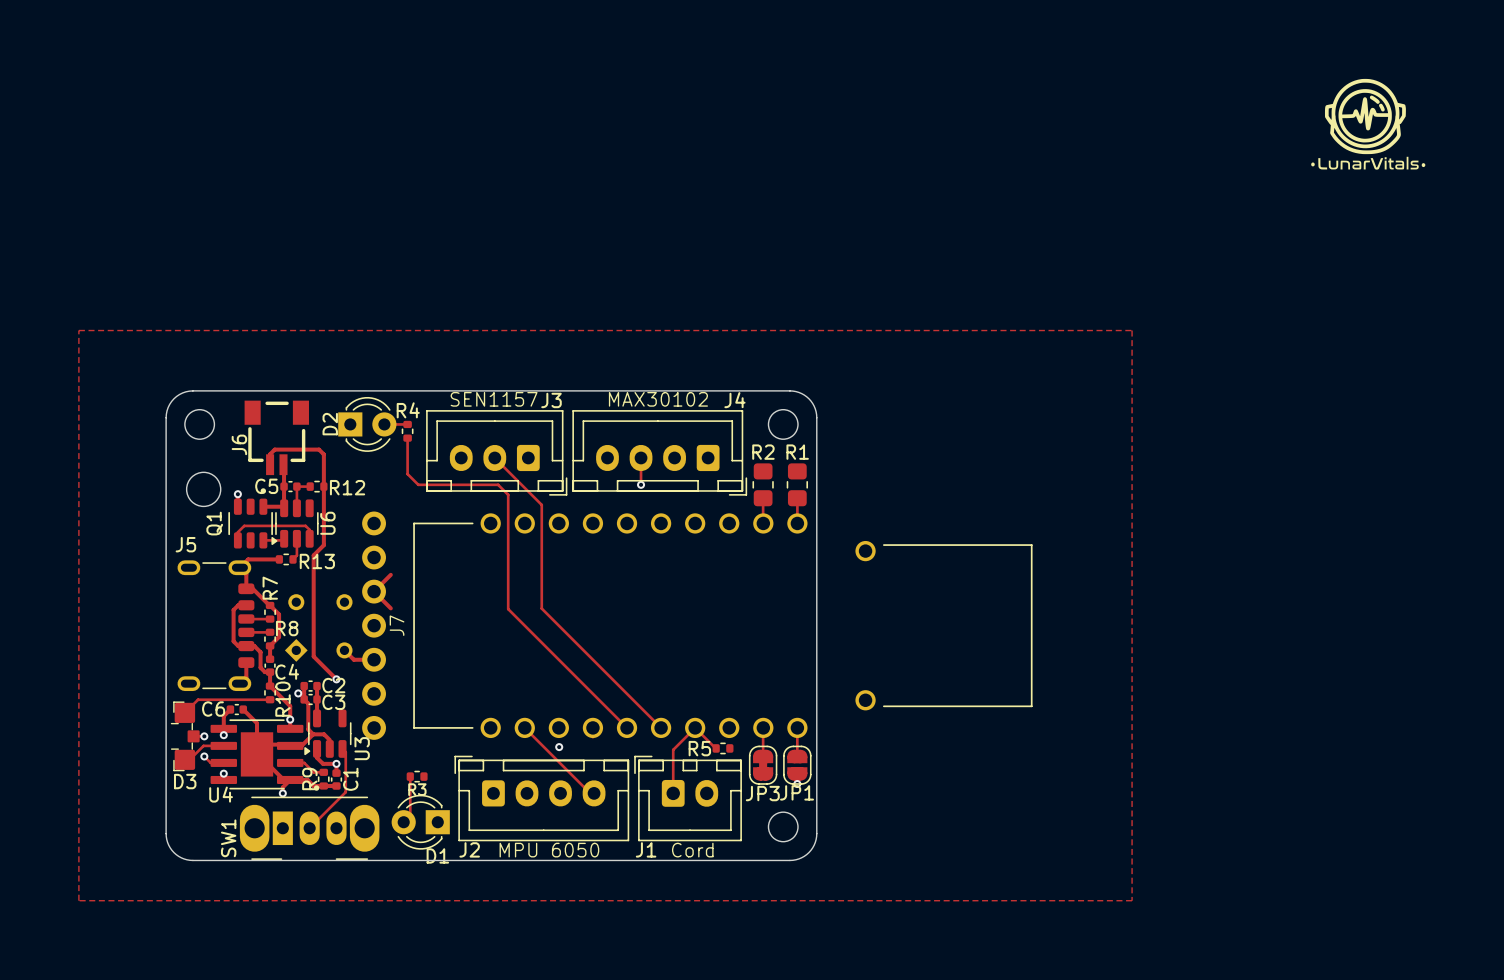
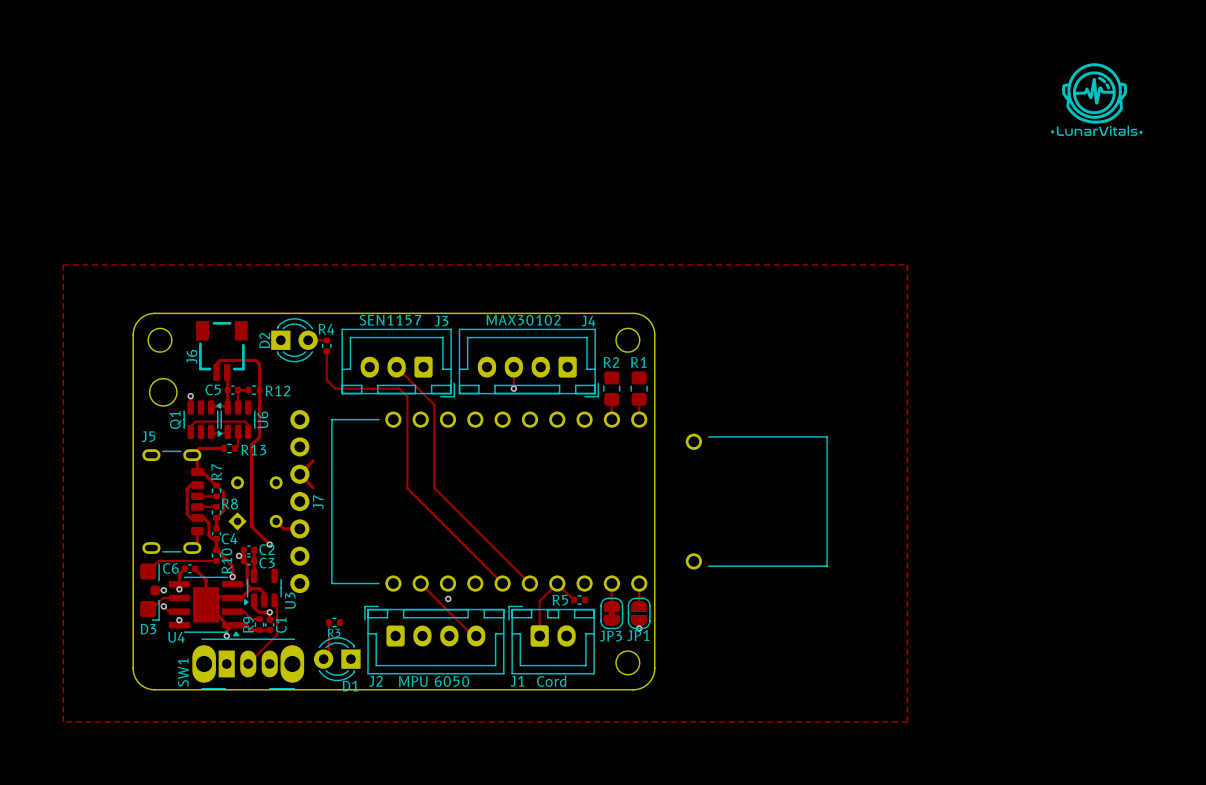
Q1 footprint: [228, 488, 273, 549] -> [183, 400, 222, 440]
D3 footprint: [170, 701, 200, 772] -> [140, 563, 161, 621]
U4 footprint: [210, 719, 320, 791] -> [168, 576, 244, 637]

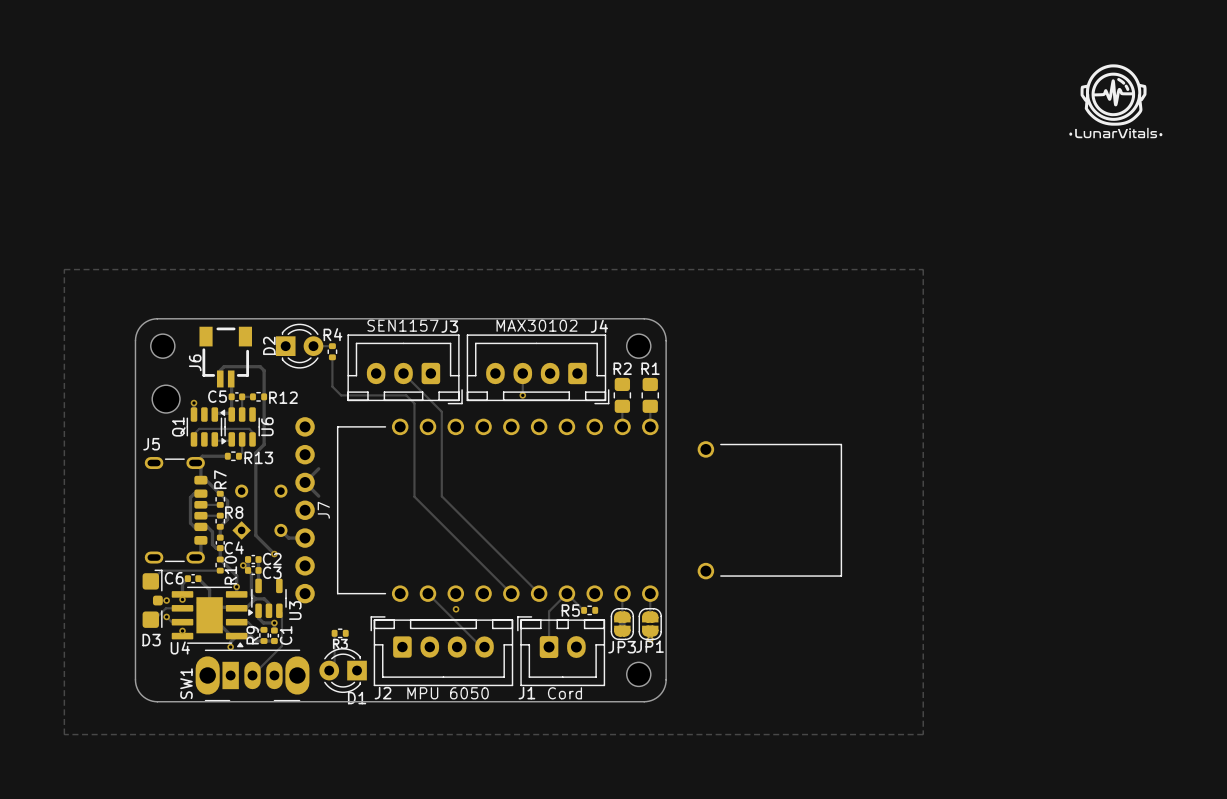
D3 footprint: [140, 563, 161, 621] -> [142, 569, 163, 628]

